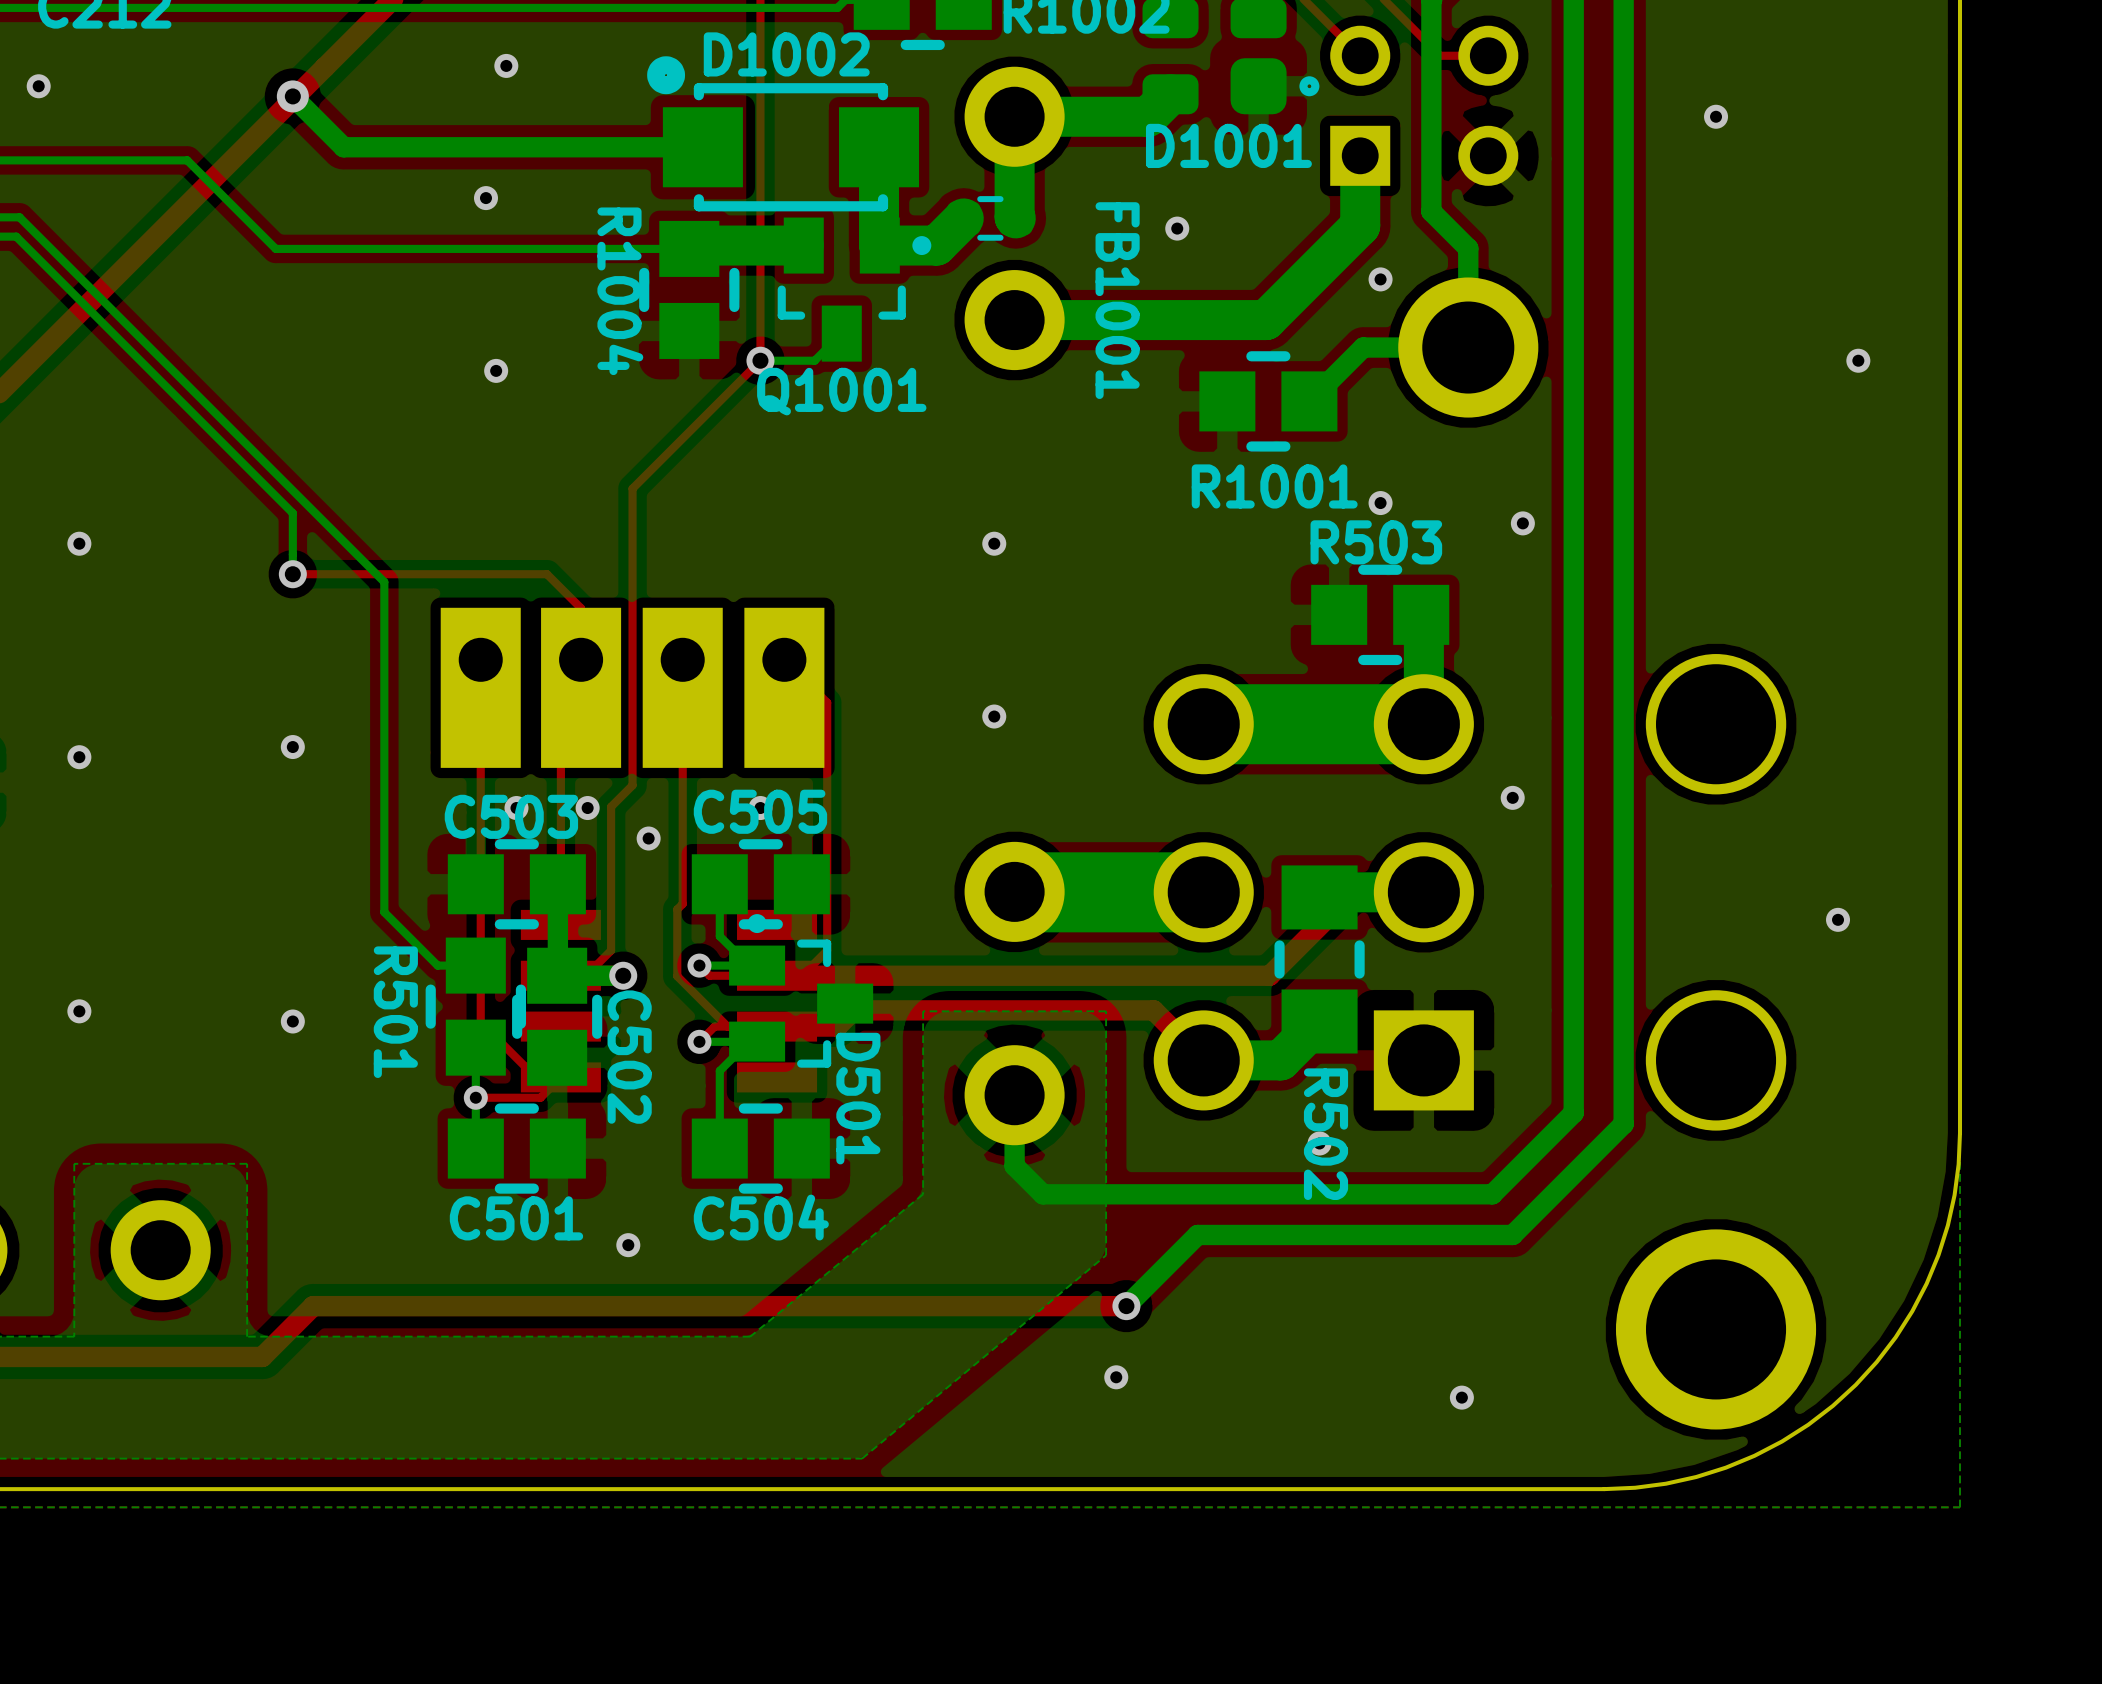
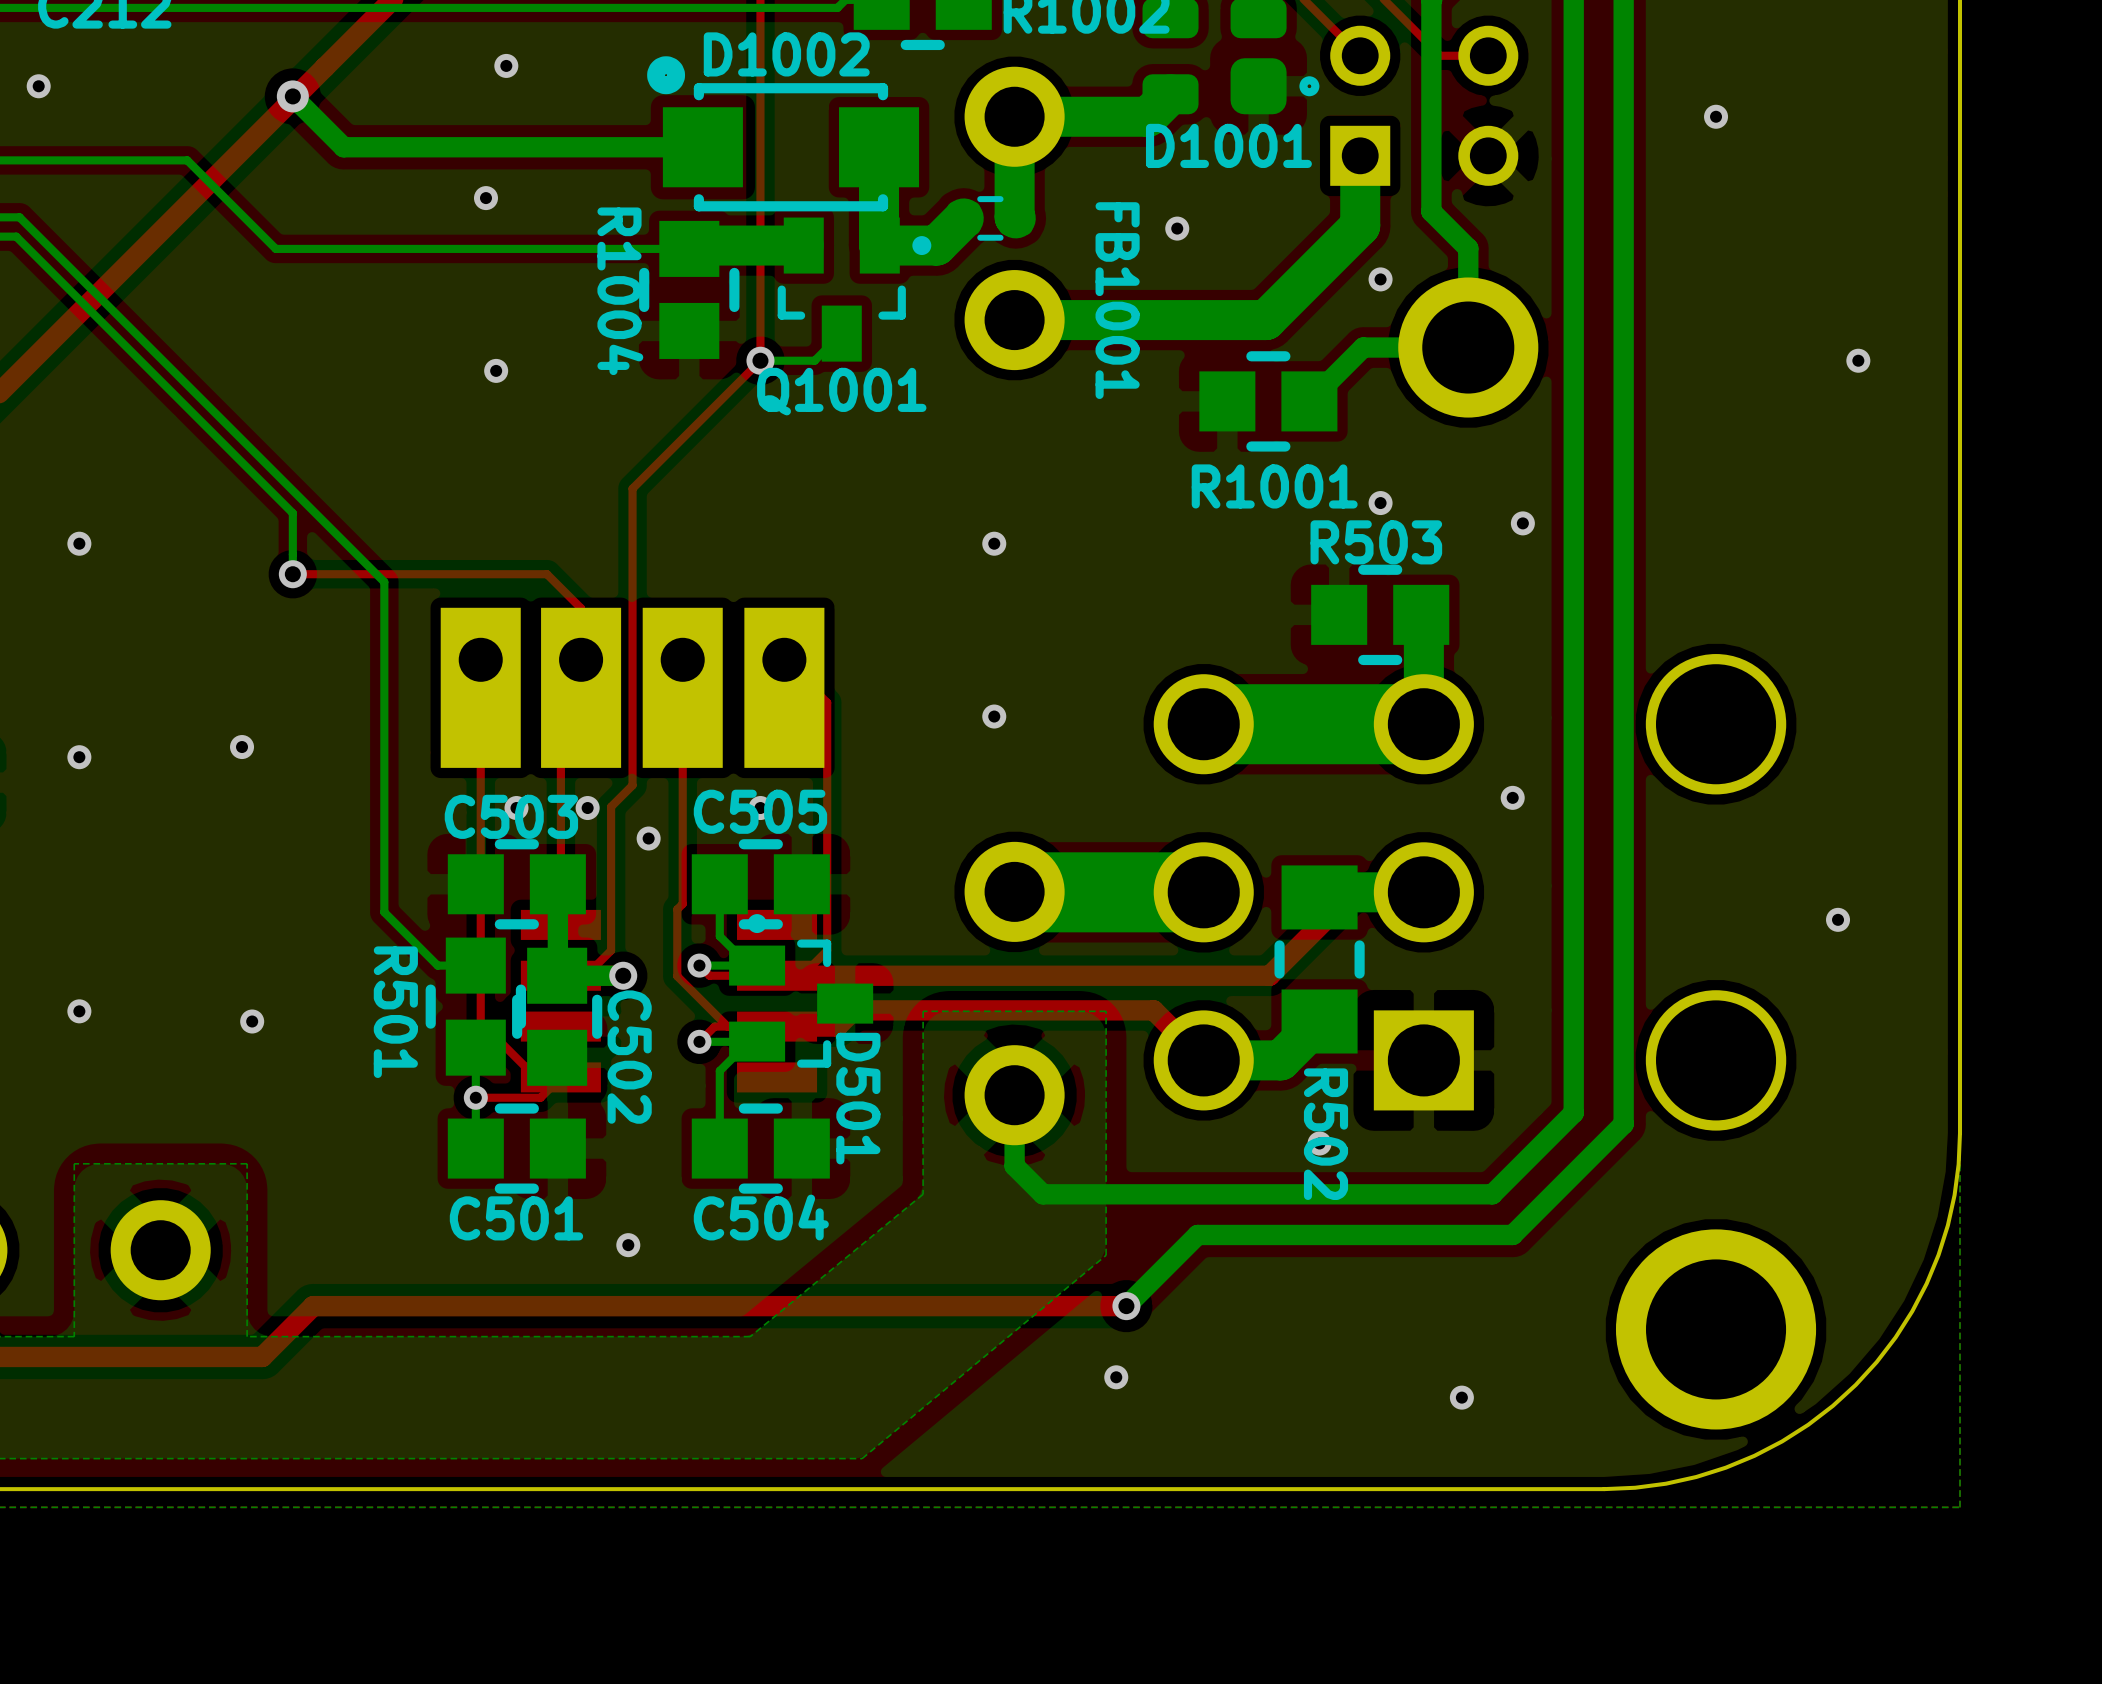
via position: (292, 747) -> (242, 747)
via position: (292, 1021) -> (252, 1021)

